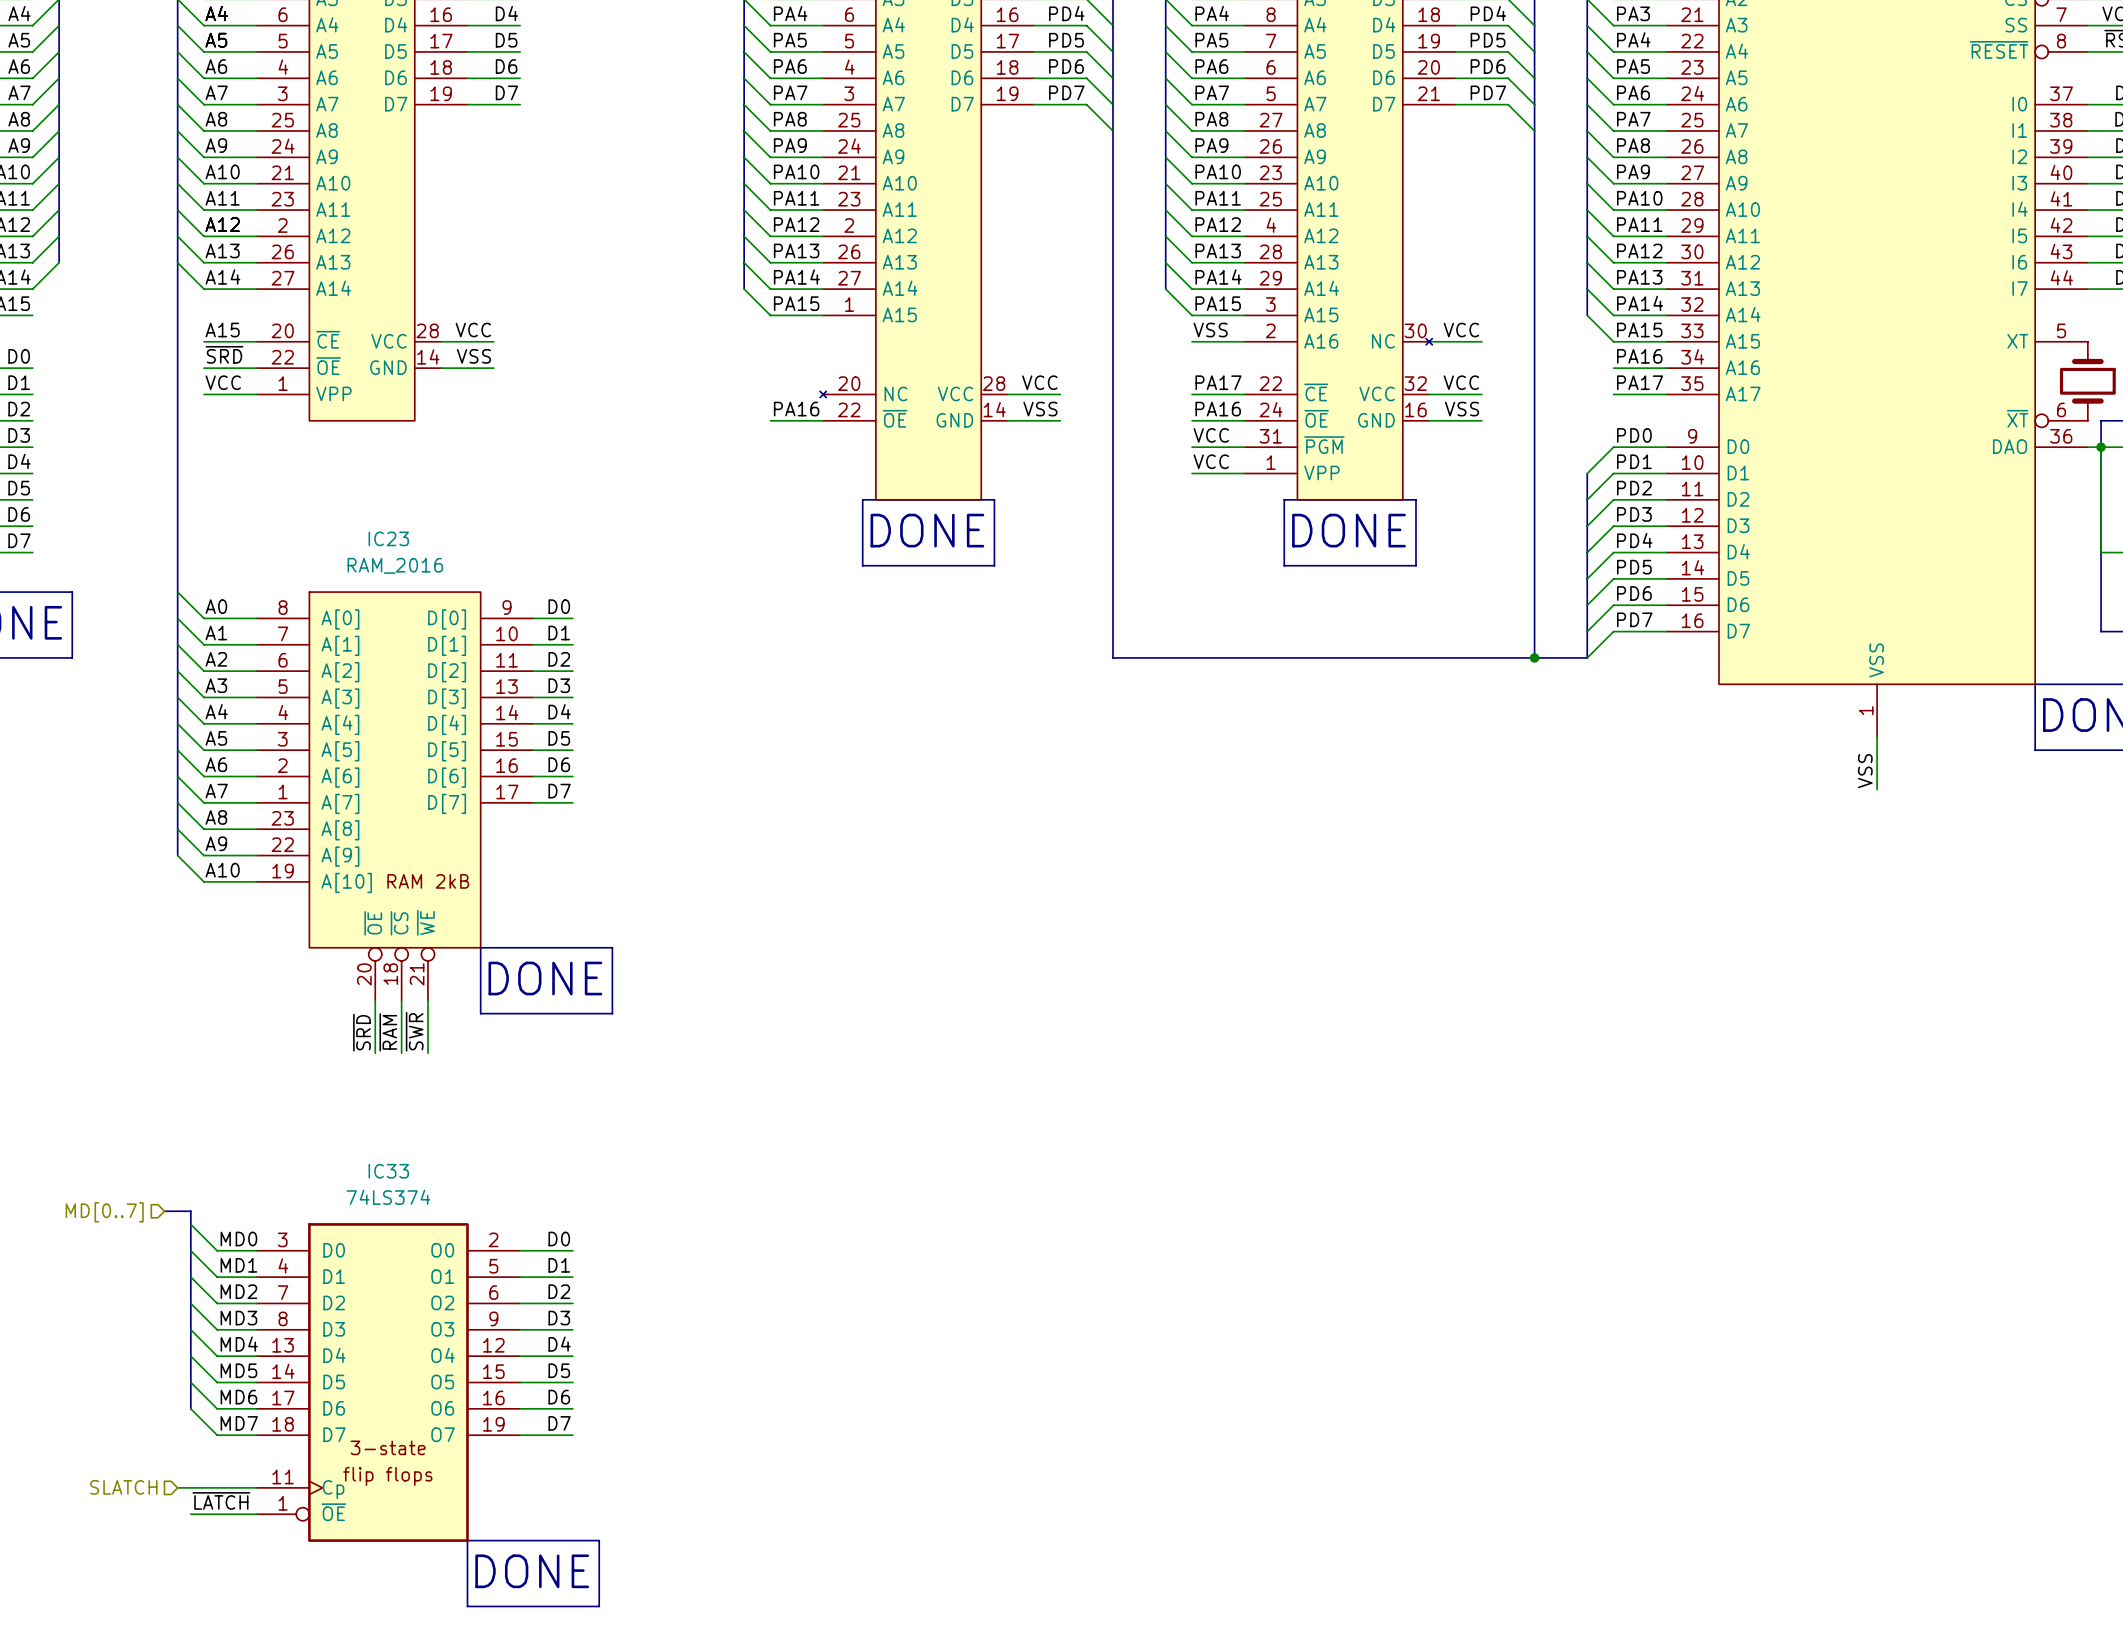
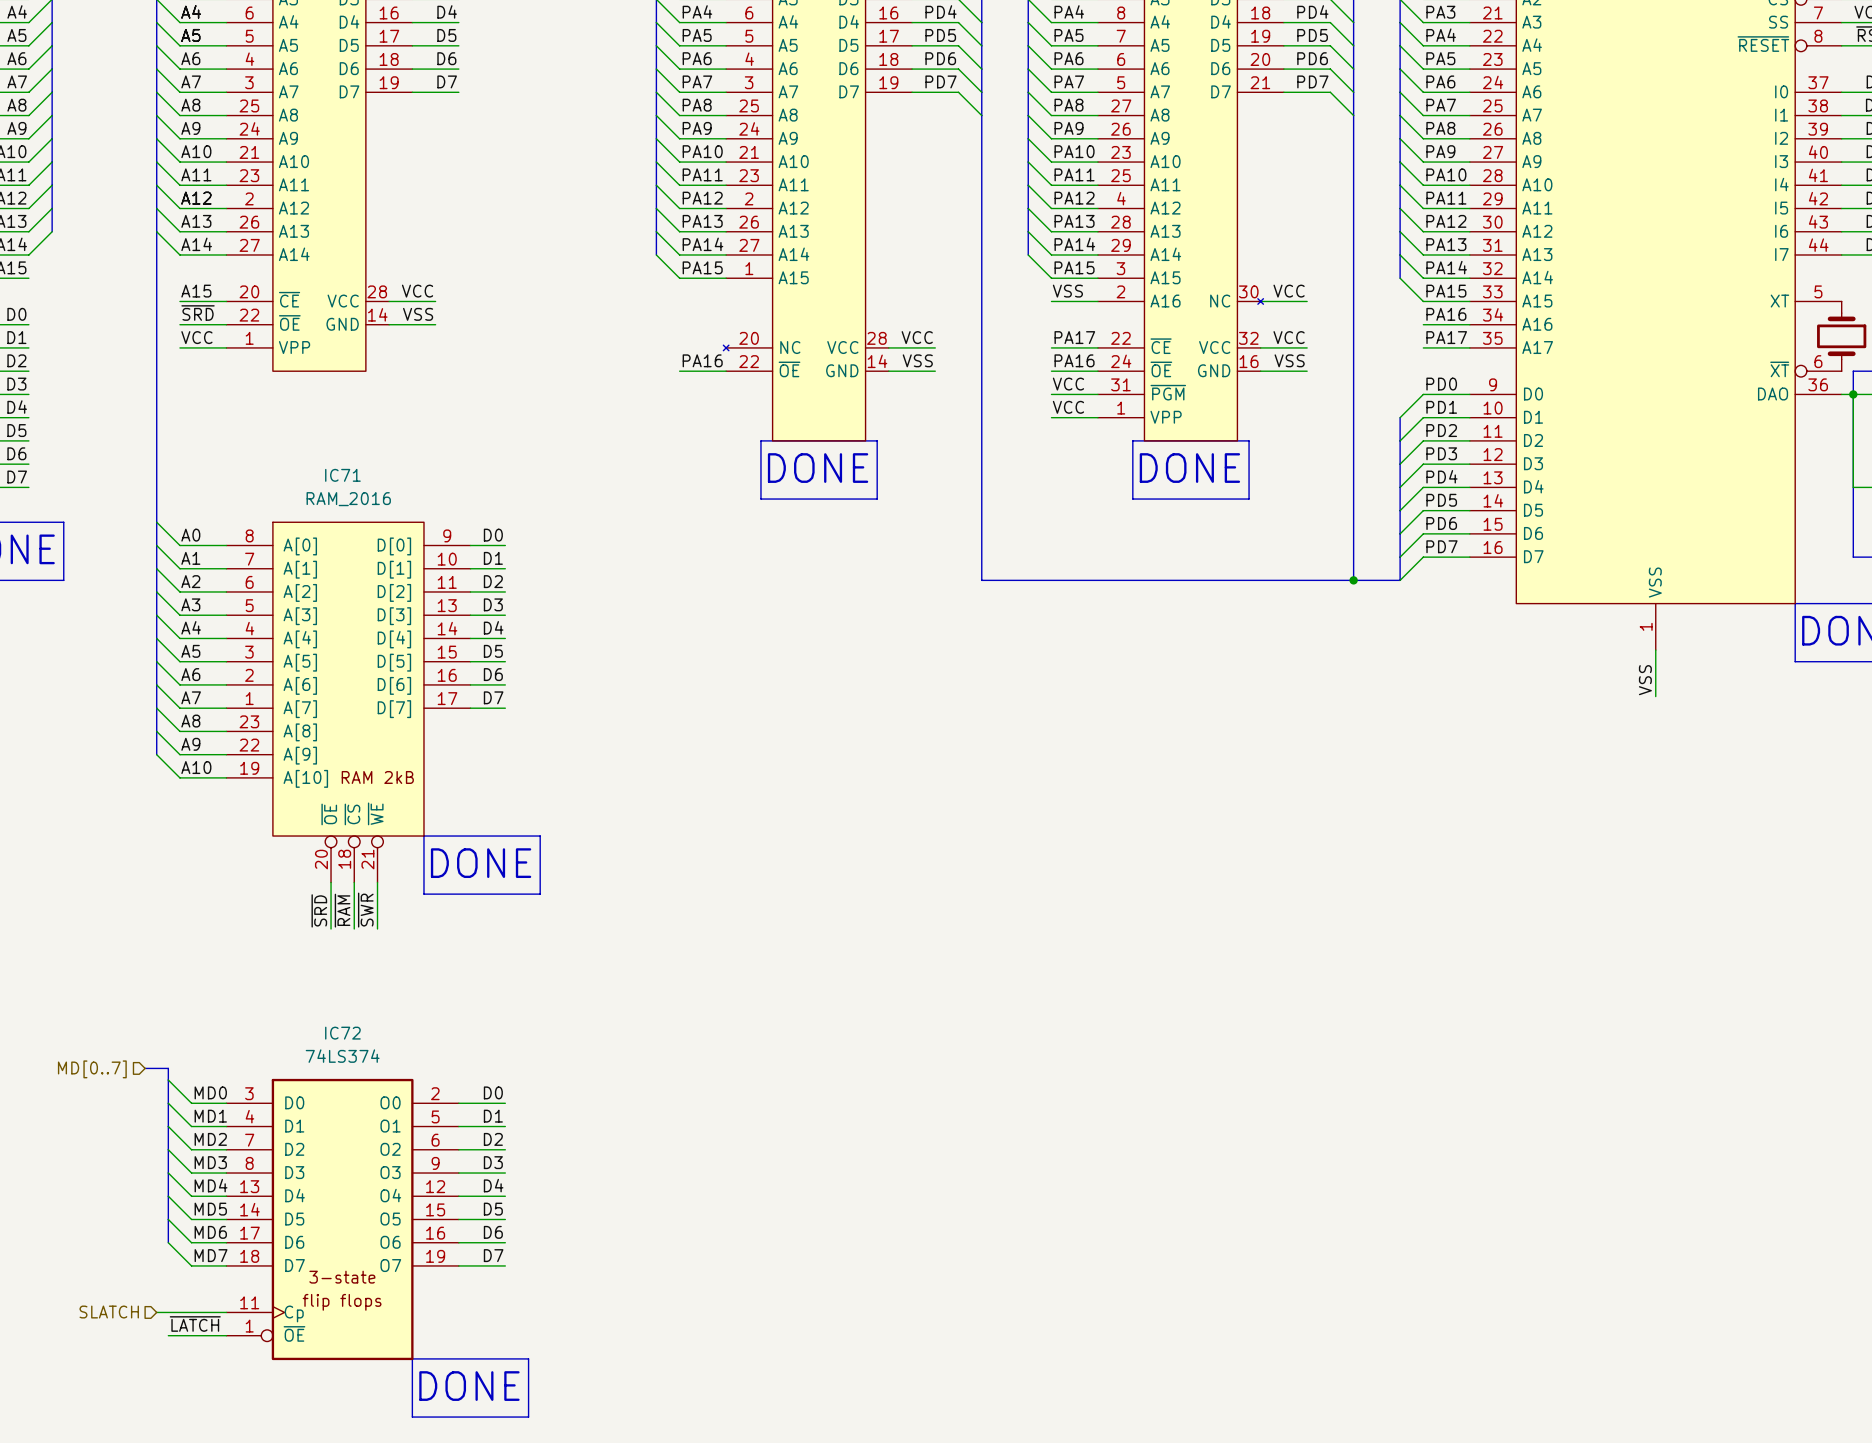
IC23 name: IC23 (388, 538) -> IC71 (342, 475)
IC33 name: IC33 (388, 1171) -> IC72 (342, 1033)

